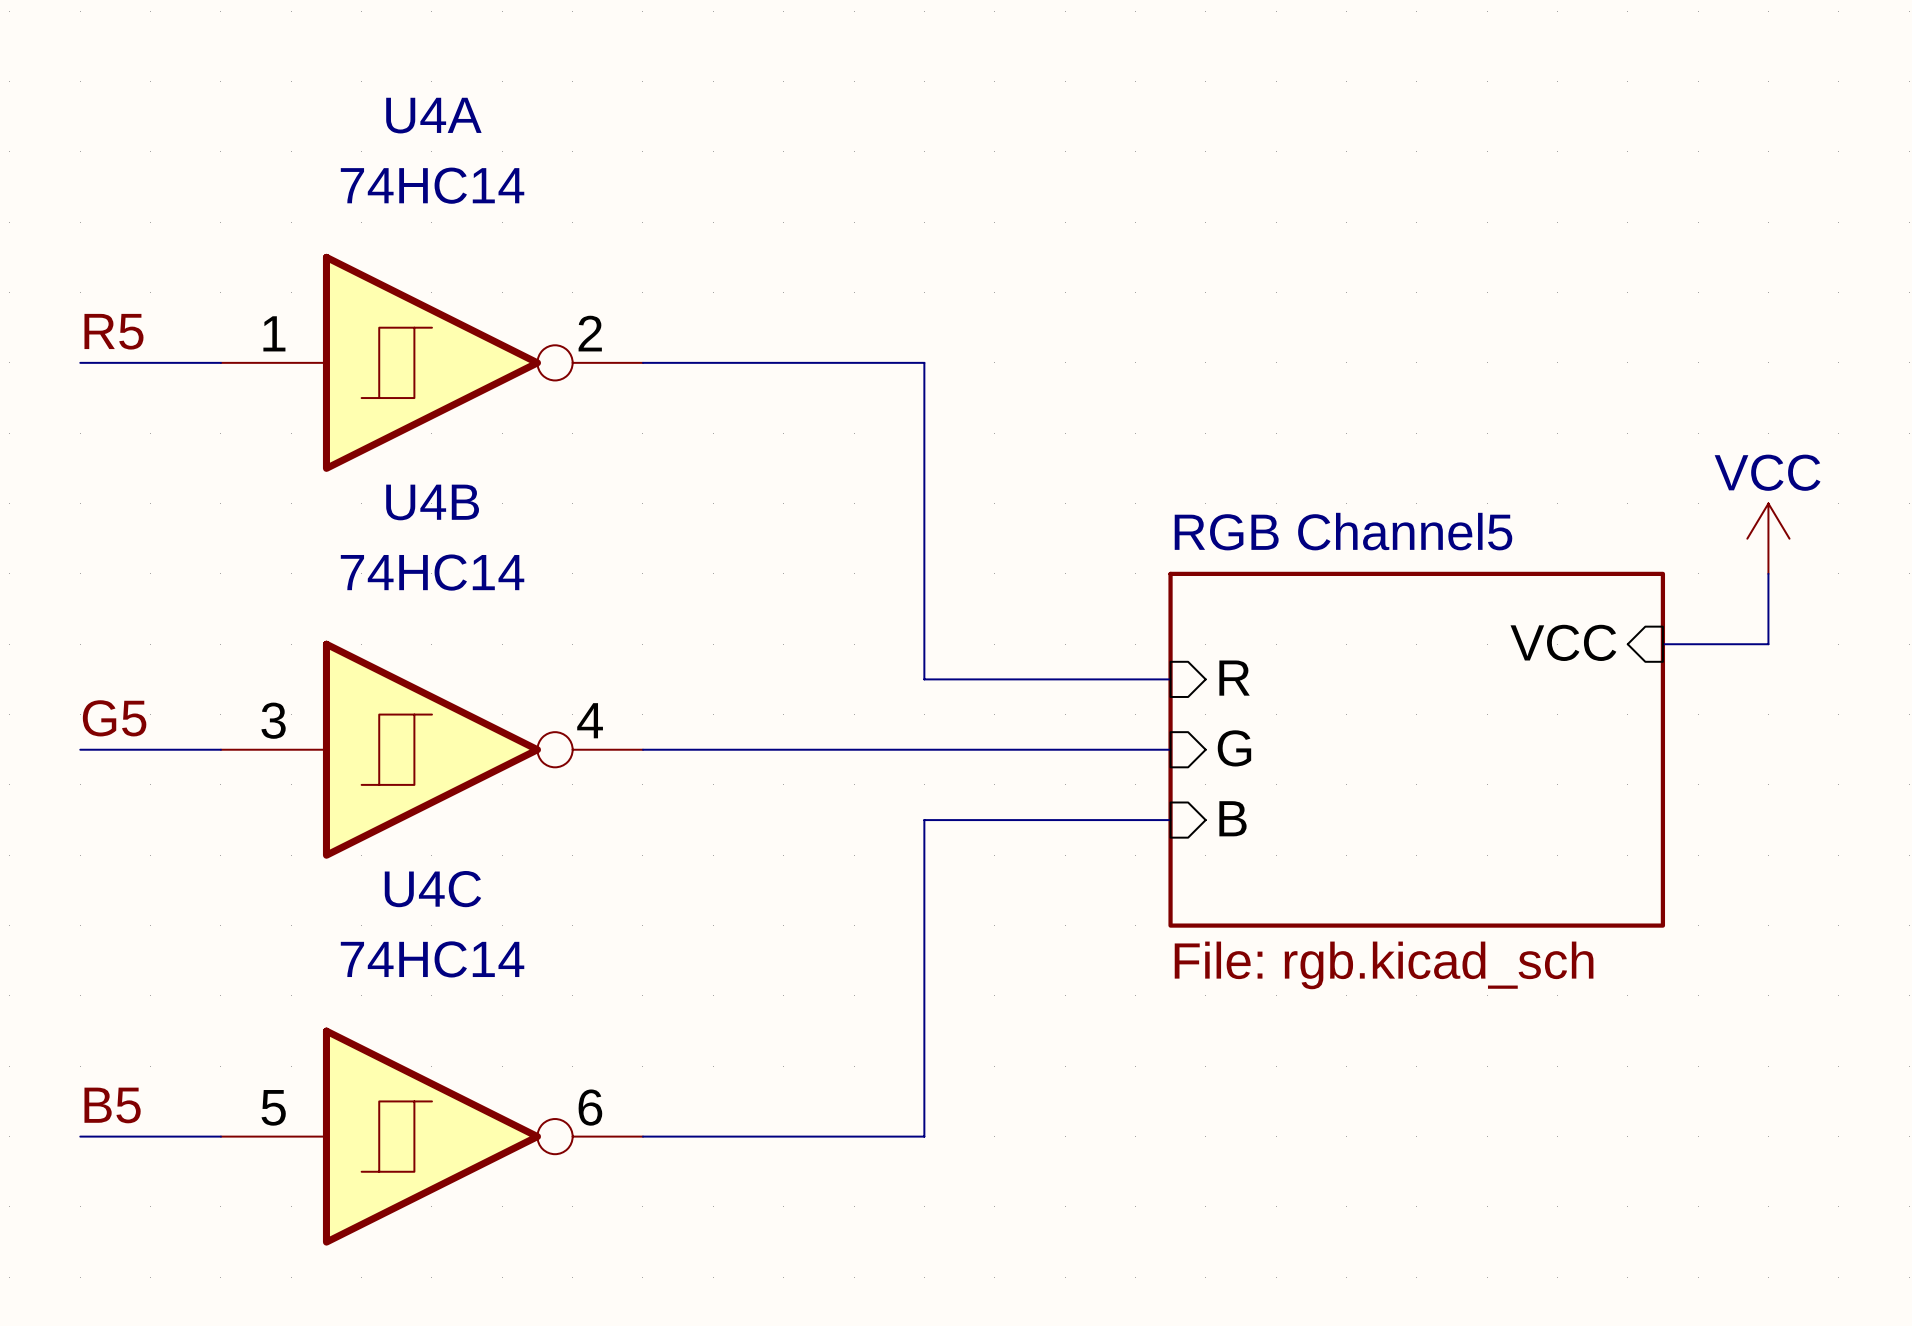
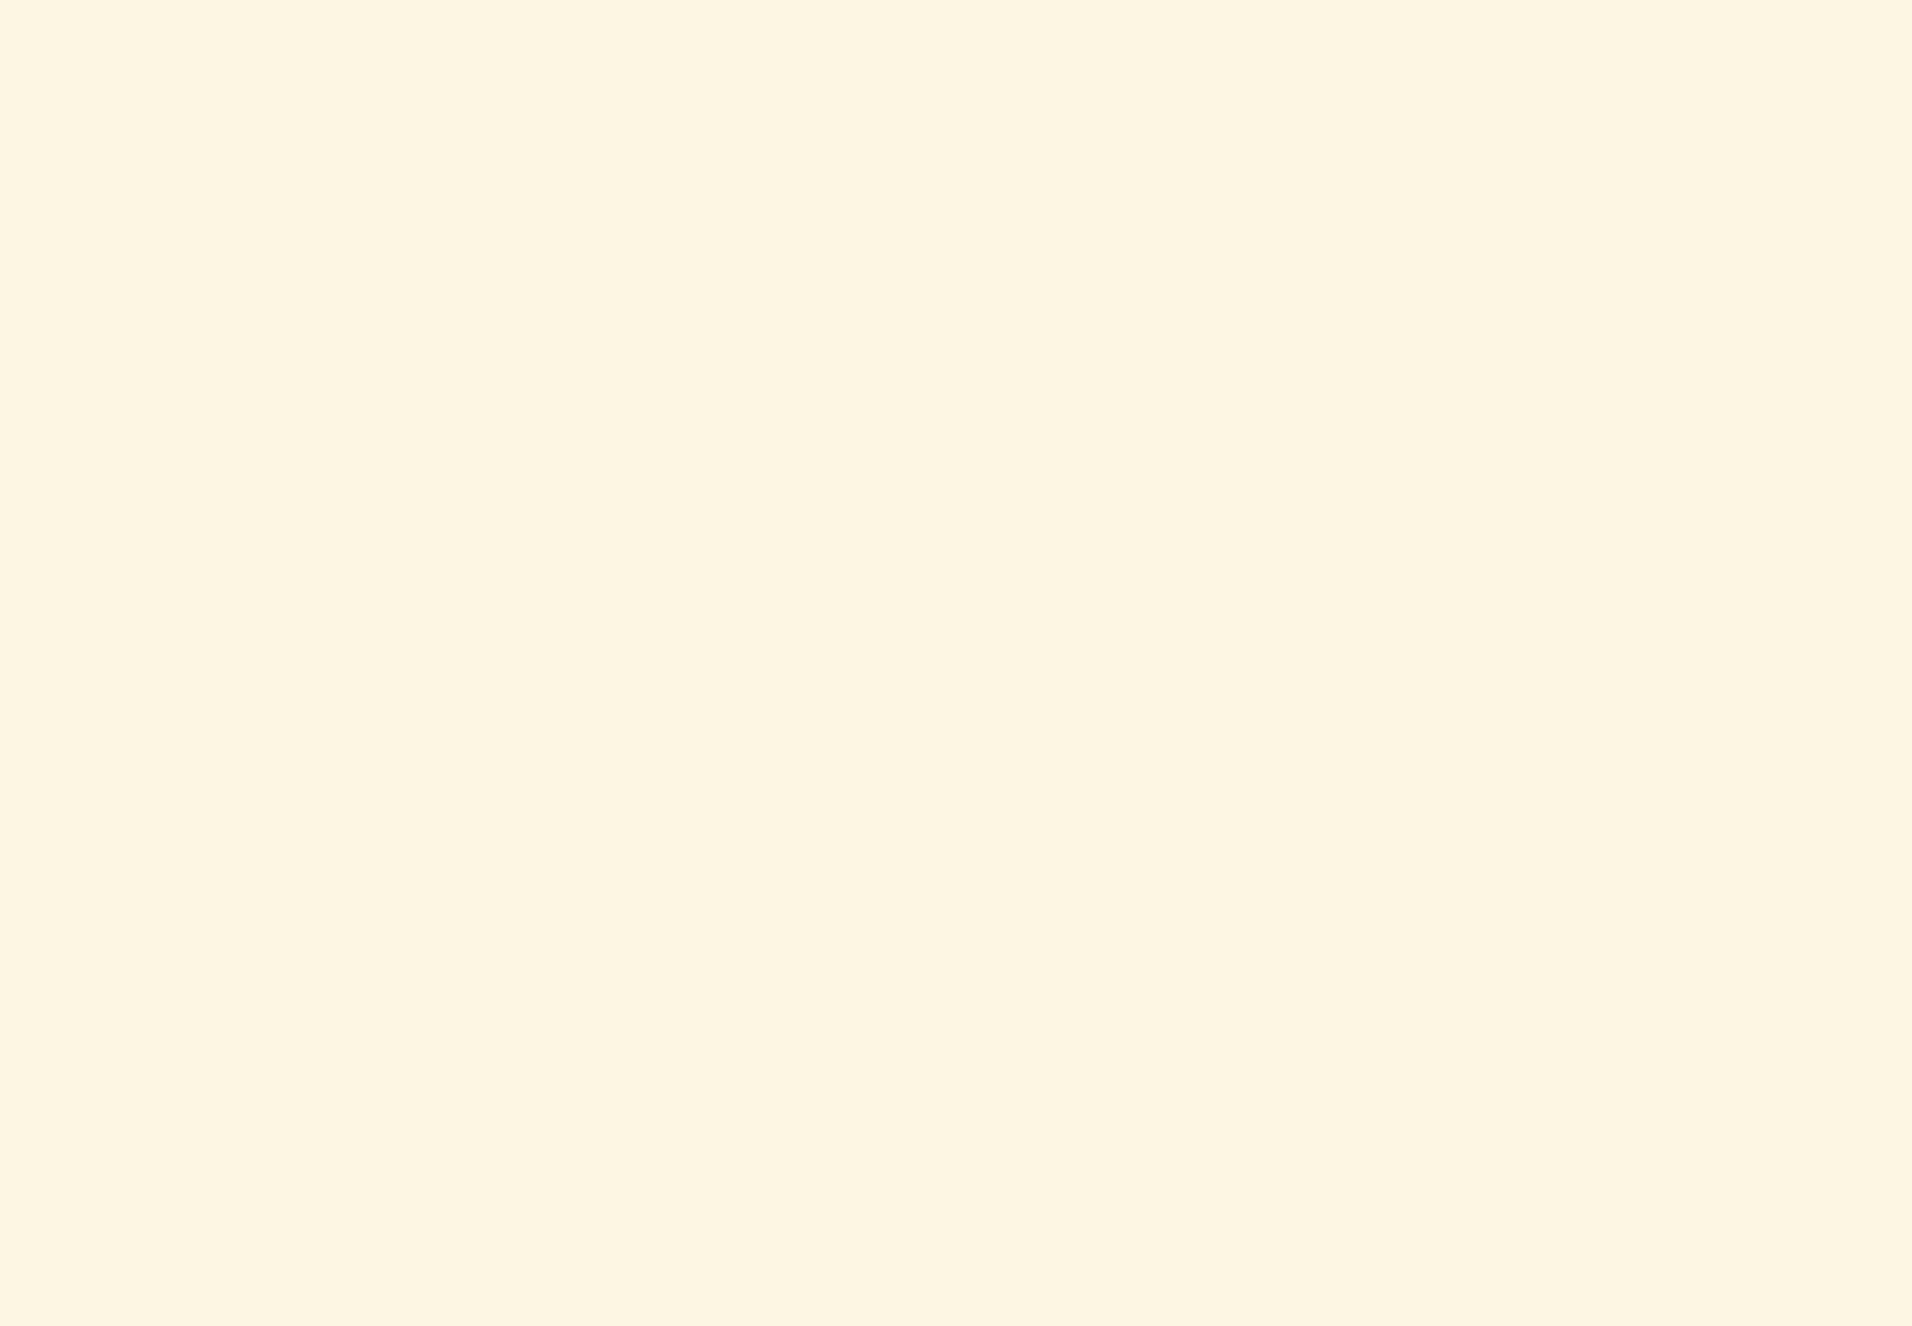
label: R5 (113, 331) -> none
wire: (80, 362) (220, 362) -> none
U4A: 74HC14 (431, 362) -> none
wire: (642, 362) (924, 362) (924, 679) (1170, 679) -> none
power symbol: VCC (1768, 538) -> none
wire: (1768, 573) (1768, 644) (1662, 644) -> none
sheet pin: VCC (1563, 642) -> none
sheet pin: R (1234, 678) -> none
label: G5 (114, 718) -> none
sheet pin: G (1234, 748) -> none
wire: (80, 749) (220, 749) -> none
U4B: 74HC14 (431, 749) -> none
wire: (642, 749) (1170, 749) -> none
sheet RGB Channel5: File: rgb.kicad_sch (1416, 749) -> none
sheet pin: B (1233, 818) -> none
wire: (1170, 820) (924, 820) (924, 1136) (642, 1136) -> none
label: B5 (112, 1105) -> none
wire: (80, 1136) (220, 1136) -> none
U4C: 74HC14 (431, 1136) -> none

